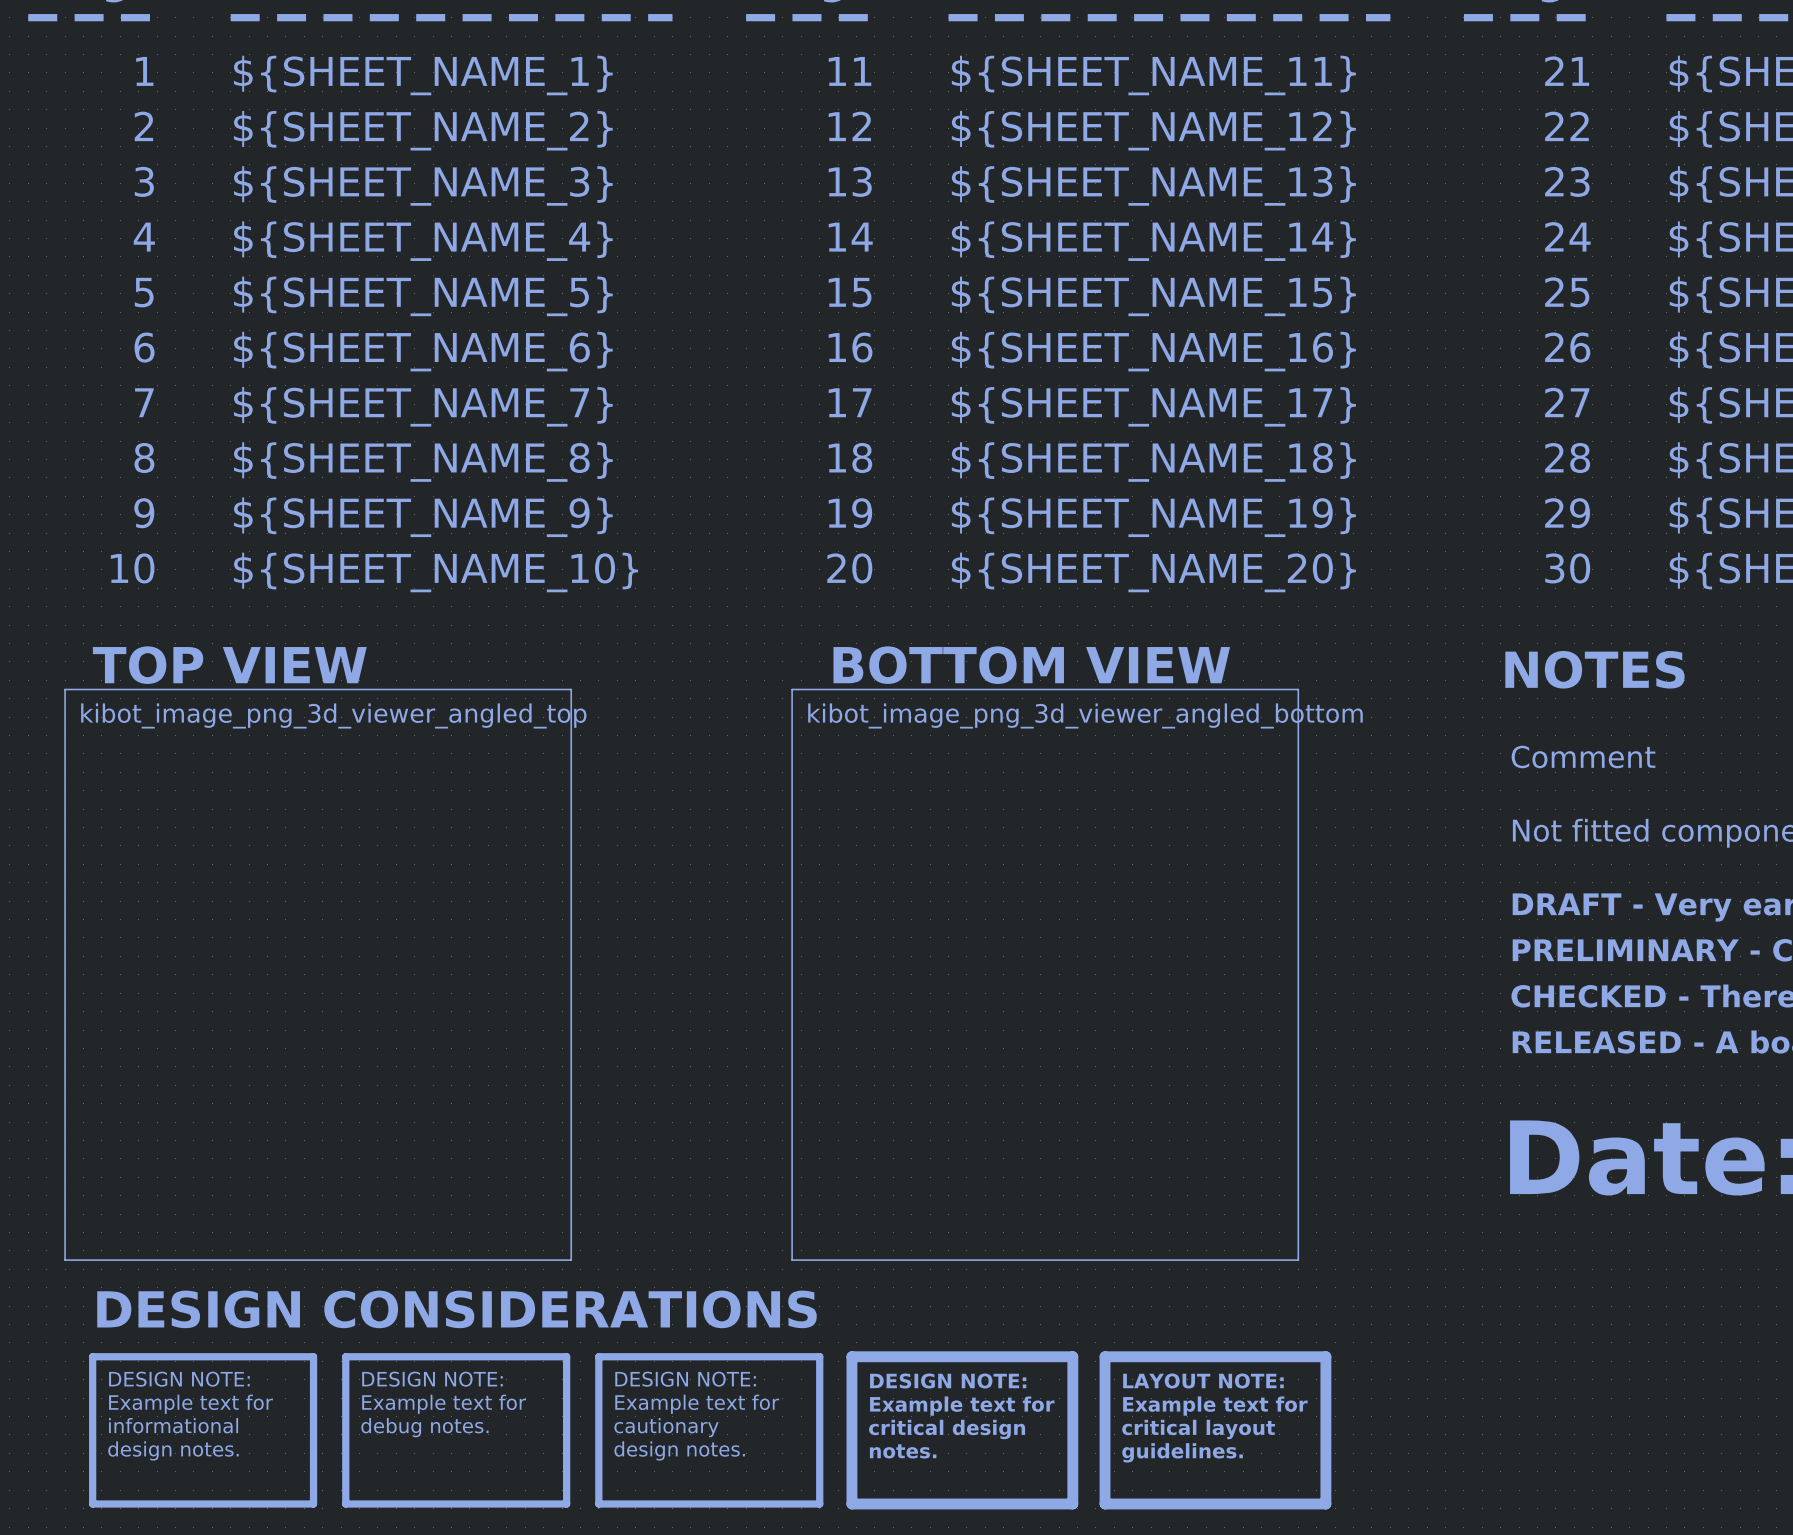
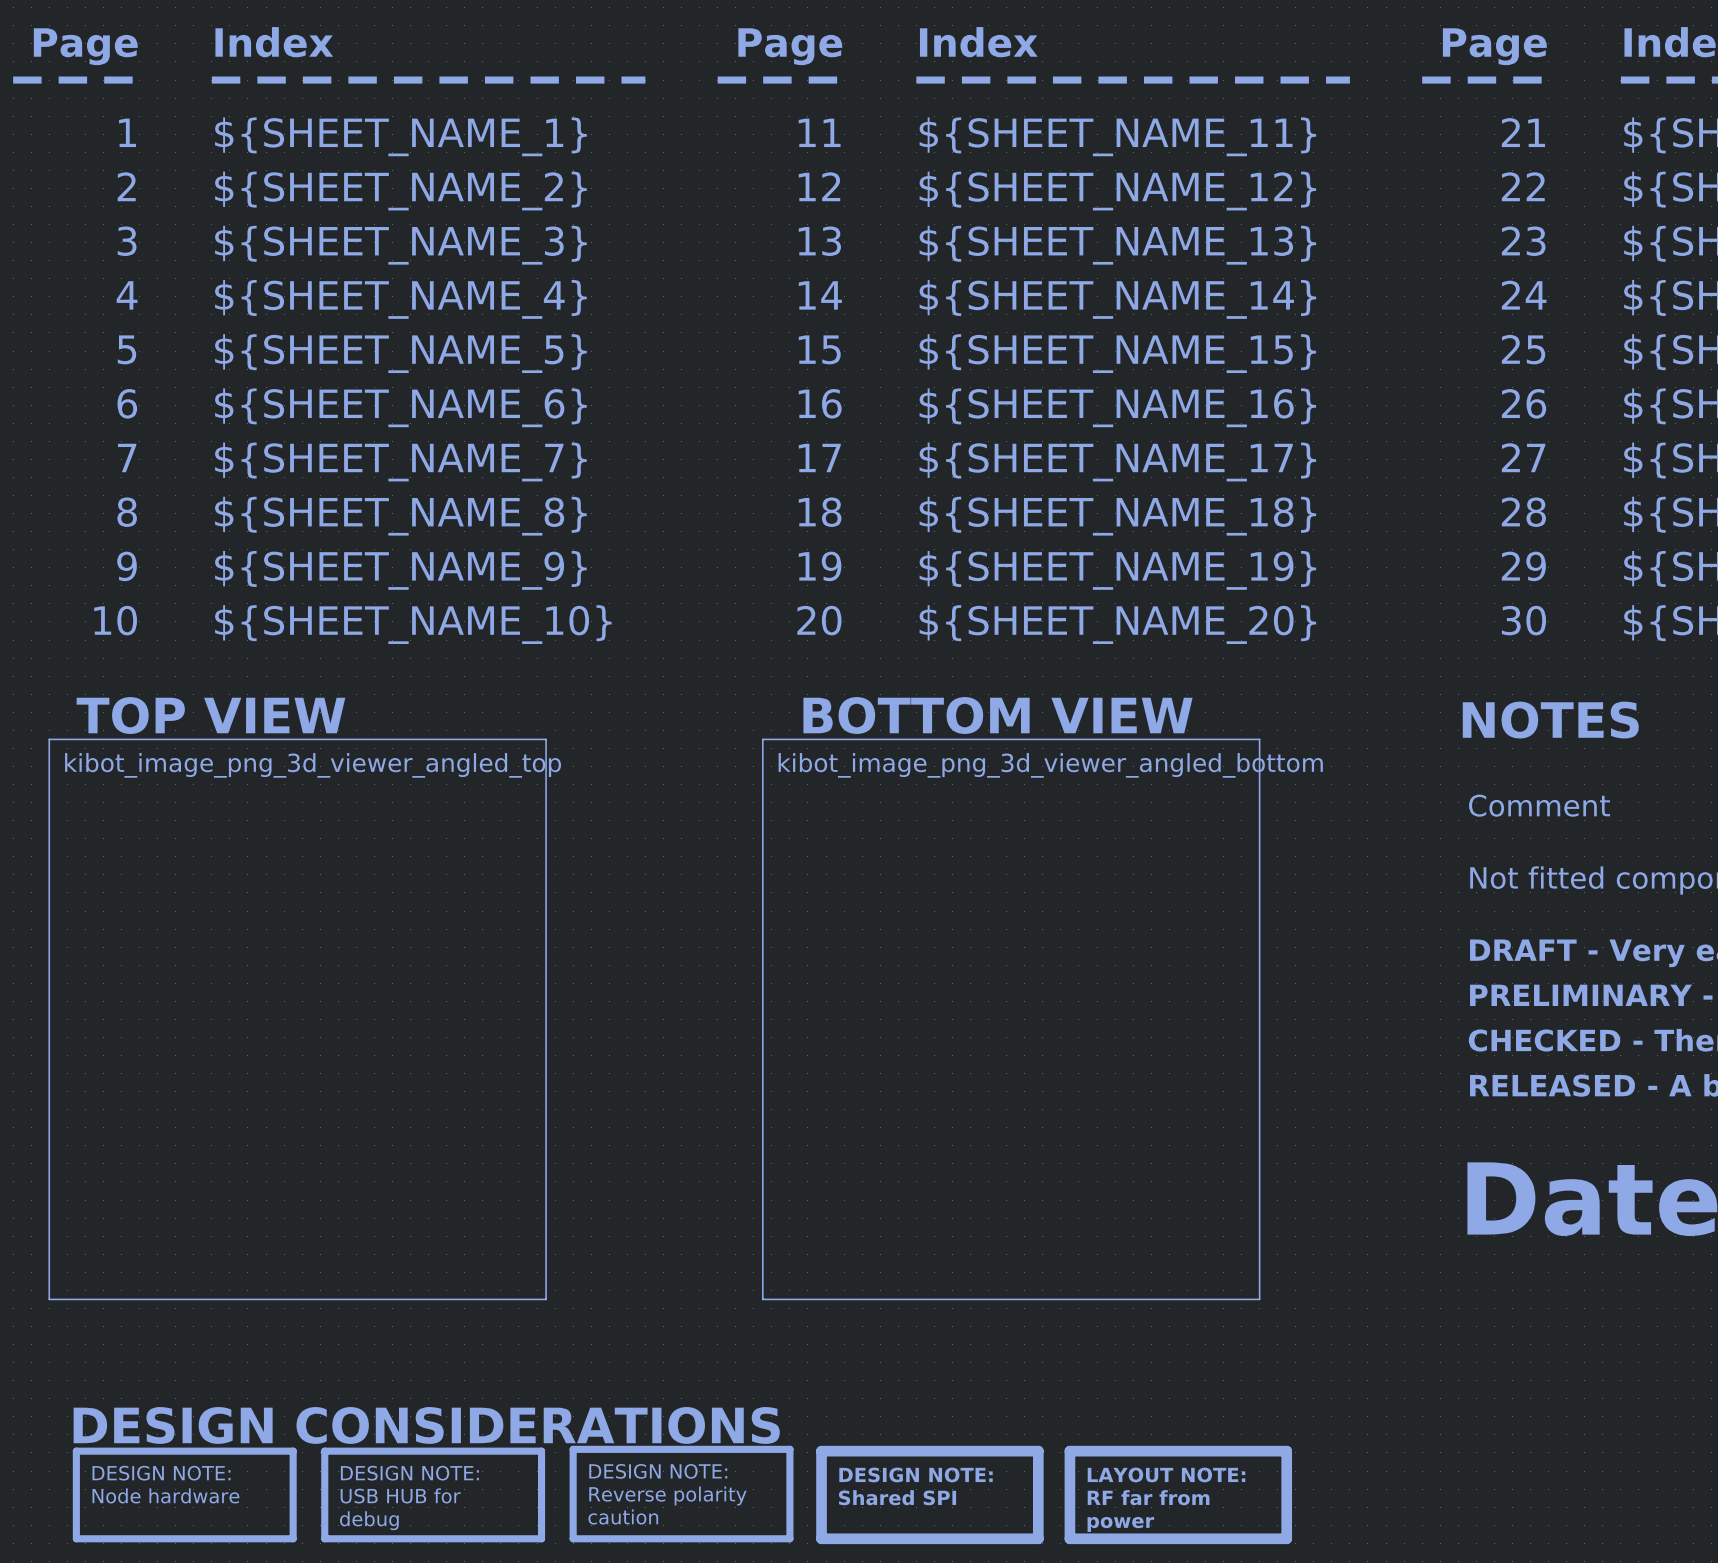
text position: DESIGN CONSIDERATIONS (456, 1309) -> DESIGN CONSIDERATIONS (426, 1425)
text position: DESIGN NOTE: (179, 1379) -> DESIGN NOTE: (161, 1473)
text position: DESIGN NOTE: (432, 1379) -> DESIGN NOTE: (409, 1473)
text position: DESIGN NOTE: (685, 1379) -> DESIGN NOTE: (658, 1471)
text position: DESIGN NOTE: (948, 1380) -> DESIGN NOTE: (916, 1474)
text position: LAYOUT NOTE: (1203, 1380) -> LAYOUT NOTE: (1166, 1474)
text: Example text for (191, 1404) -> none
text: Example text for (444, 1404) -> none
text: Example text for (697, 1404) -> none
text: Example text for (962, 1406) -> none
text: Example text for (1215, 1406) -> none
line: (598, 1412) (598, 1356) (819, 1356) (819, 1412) -> (573, 1449) (789, 1449)
line: (92, 1414) (92, 1356) (313, 1356) (313, 1414) -> (76, 1451) (293, 1451)
line: (345, 1414) (345, 1356) (566, 1356) (566, 1414) -> (324, 1451) (541, 1451)
line: (851, 1414) (851, 1356) (1072, 1356) (1072, 1414) -> (821, 1451) (1038, 1451)
line: (1105, 1414) (1105, 1356) (1325, 1356) (1325, 1414) -> (1069, 1451) (1286, 1451)
text: informational (173, 1425) -> none
text: debug notes. (424, 1427) -> none
text: cautionary (666, 1427) -> none
text: critical design (947, 1429) -> none
text: critical layout (1198, 1429) -> none
text: design notes. (173, 1450) -> none
text: design notes. (679, 1450) -> none
text: notes. (903, 1451) -> none
text: guidelines. (1182, 1452) -> none
text: none -> Node hardware (165, 1495)
text: none -> USB HUB for (400, 1495)
text: none -> Reverse polarity (667, 1495)
text: none -> Shared SPI (897, 1497)
text: none -> RF far from (1148, 1497)
text: none -> caution (623, 1517)
text: none -> debug (369, 1520)
text: none -> power (1120, 1524)

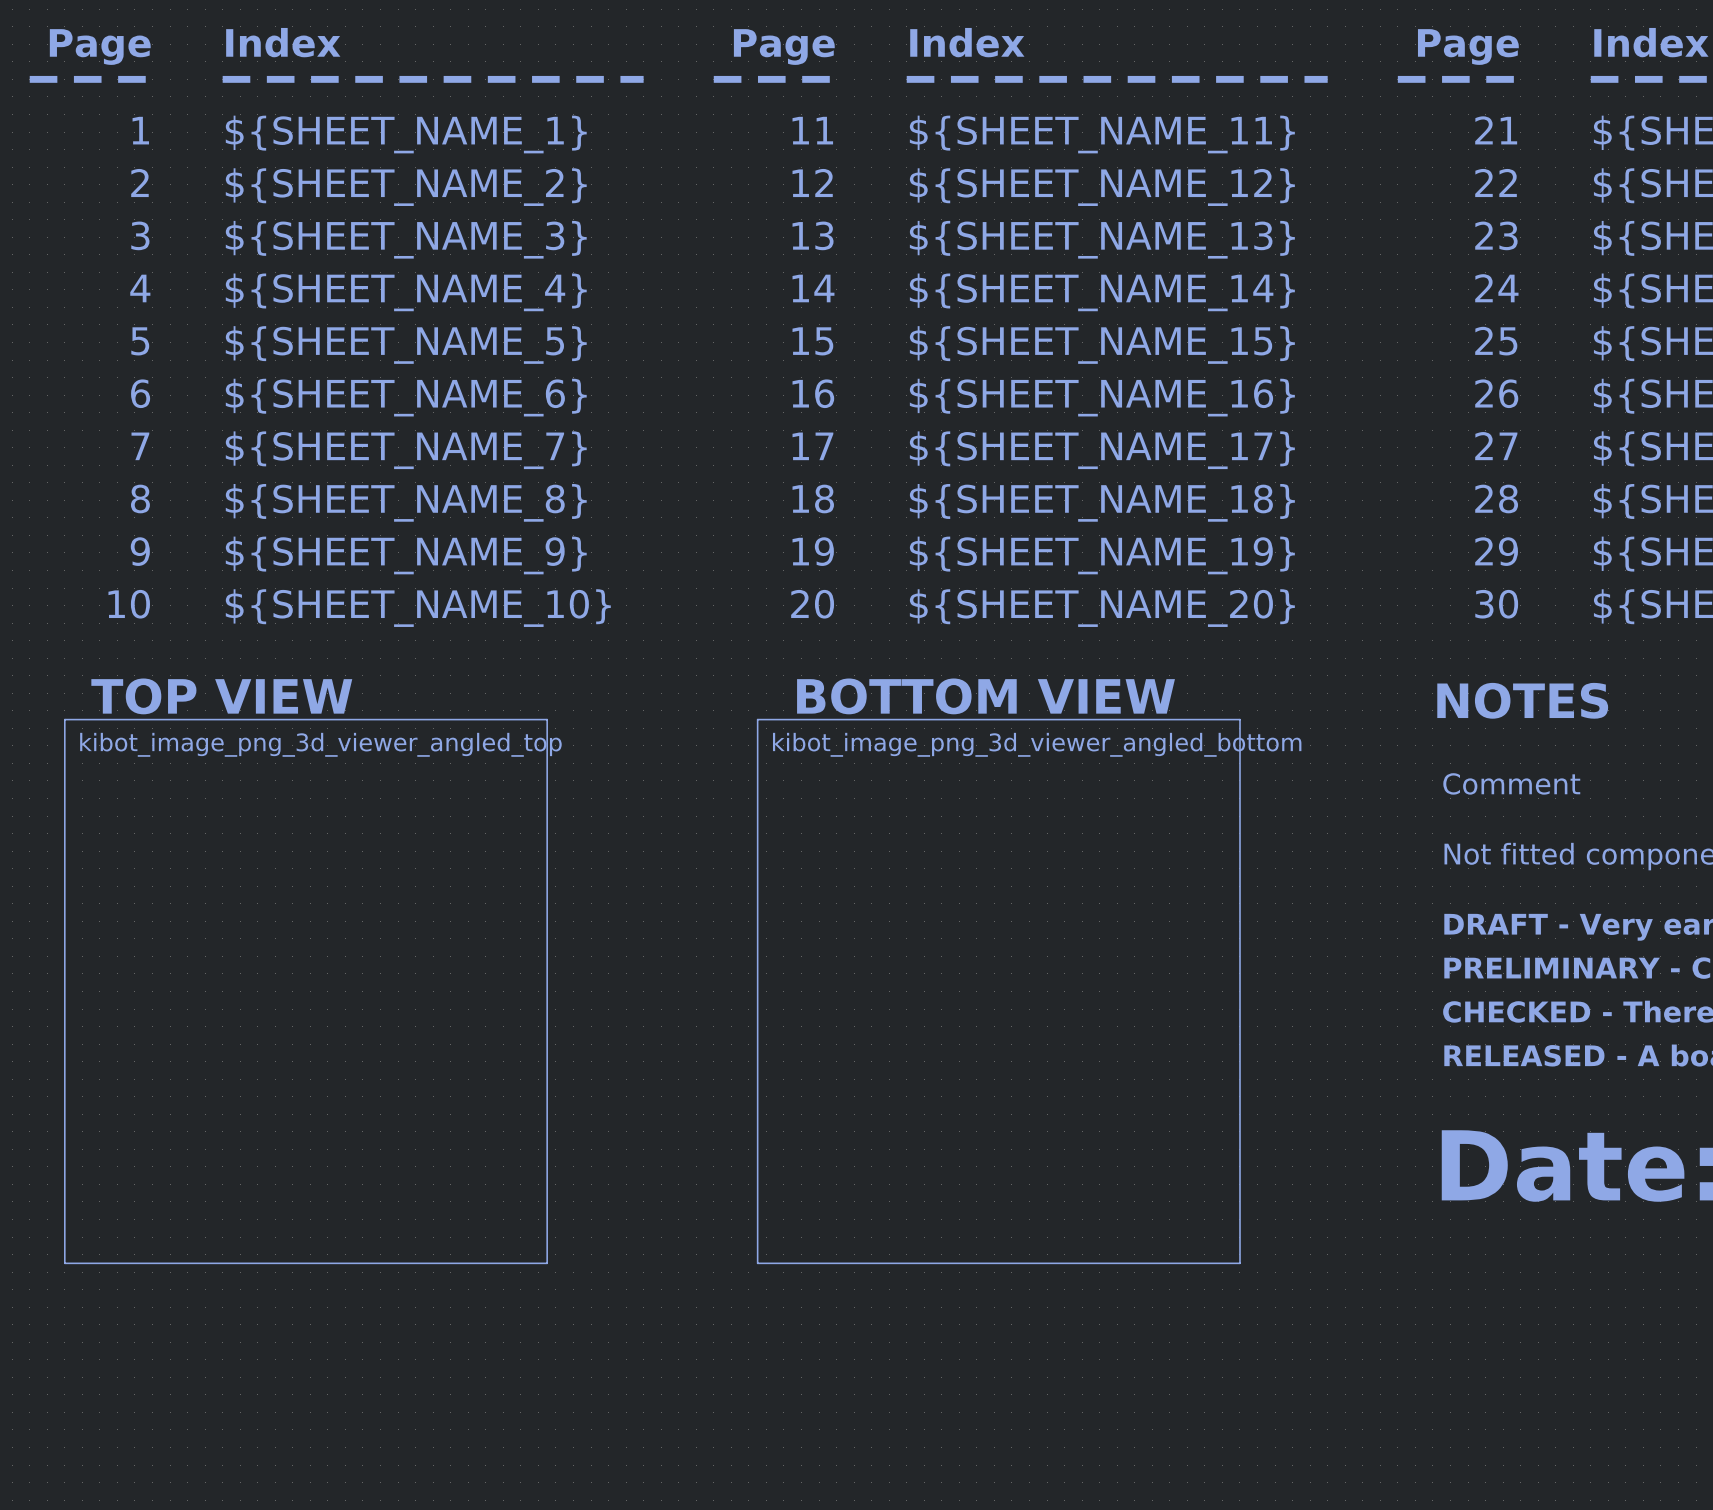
text: DESIGN CONSIDERATIONS (426, 1425) -> none
line: (573, 1449) (789, 1449) (789, 1538) (573, 1538) (573, 1449) -> none
text: DESIGN NOTE: (658, 1471) -> none
text: DESIGN NOTE: (161, 1473) -> none
text: DESIGN NOTE: (409, 1473) -> none
text: DESIGN NOTE: (916, 1474) -> none
text: LAYOUT NOTE: (1166, 1474) -> none
text: Node hardware (165, 1495) -> none
text: USB HUB for (400, 1495) -> none
text: Reverse polarity (667, 1495) -> none
text: Shared SPI (897, 1497) -> none
text: RF far from (1148, 1497) -> none
text: caution (623, 1517) -> none
text: debug (369, 1520) -> none
text: power (1120, 1524) -> none
line: (76, 1538) (293, 1538) -> none
line: (76, 1538) (76, 1451) (293, 1451) (293, 1538) -> none
line: (324, 1538) (541, 1538) -> none
line: (324, 1538) (324, 1451) (541, 1451) (541, 1538) -> none
line: (821, 1538) (1038, 1538) -> none
line: (821, 1538) (821, 1451) (1038, 1451) (1038, 1538) -> none
line: (1069, 1538) (1286, 1538) -> none
line: (1069, 1538) (1069, 1451) (1286, 1451) (1286, 1538) -> none

